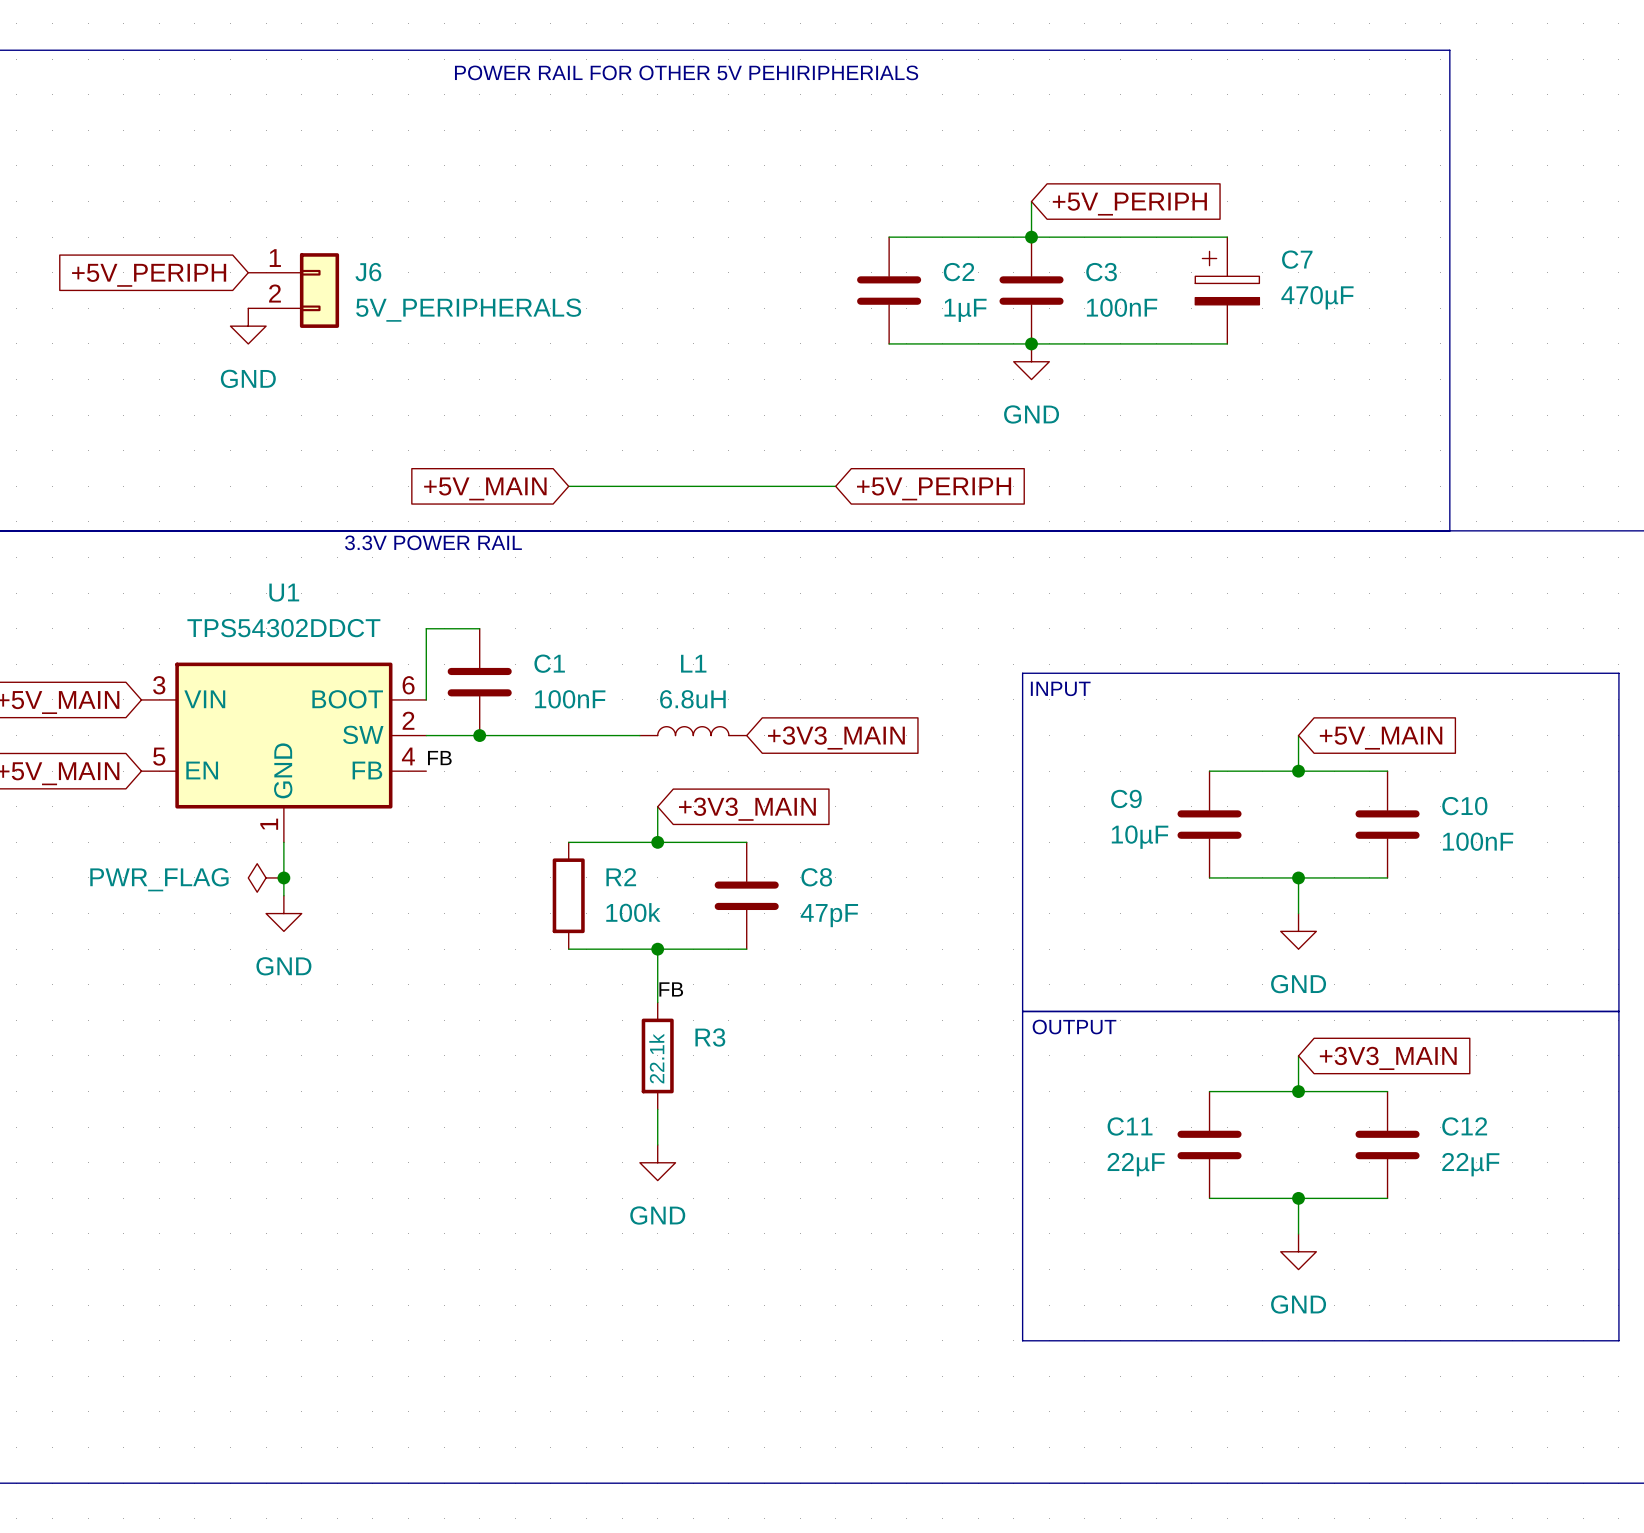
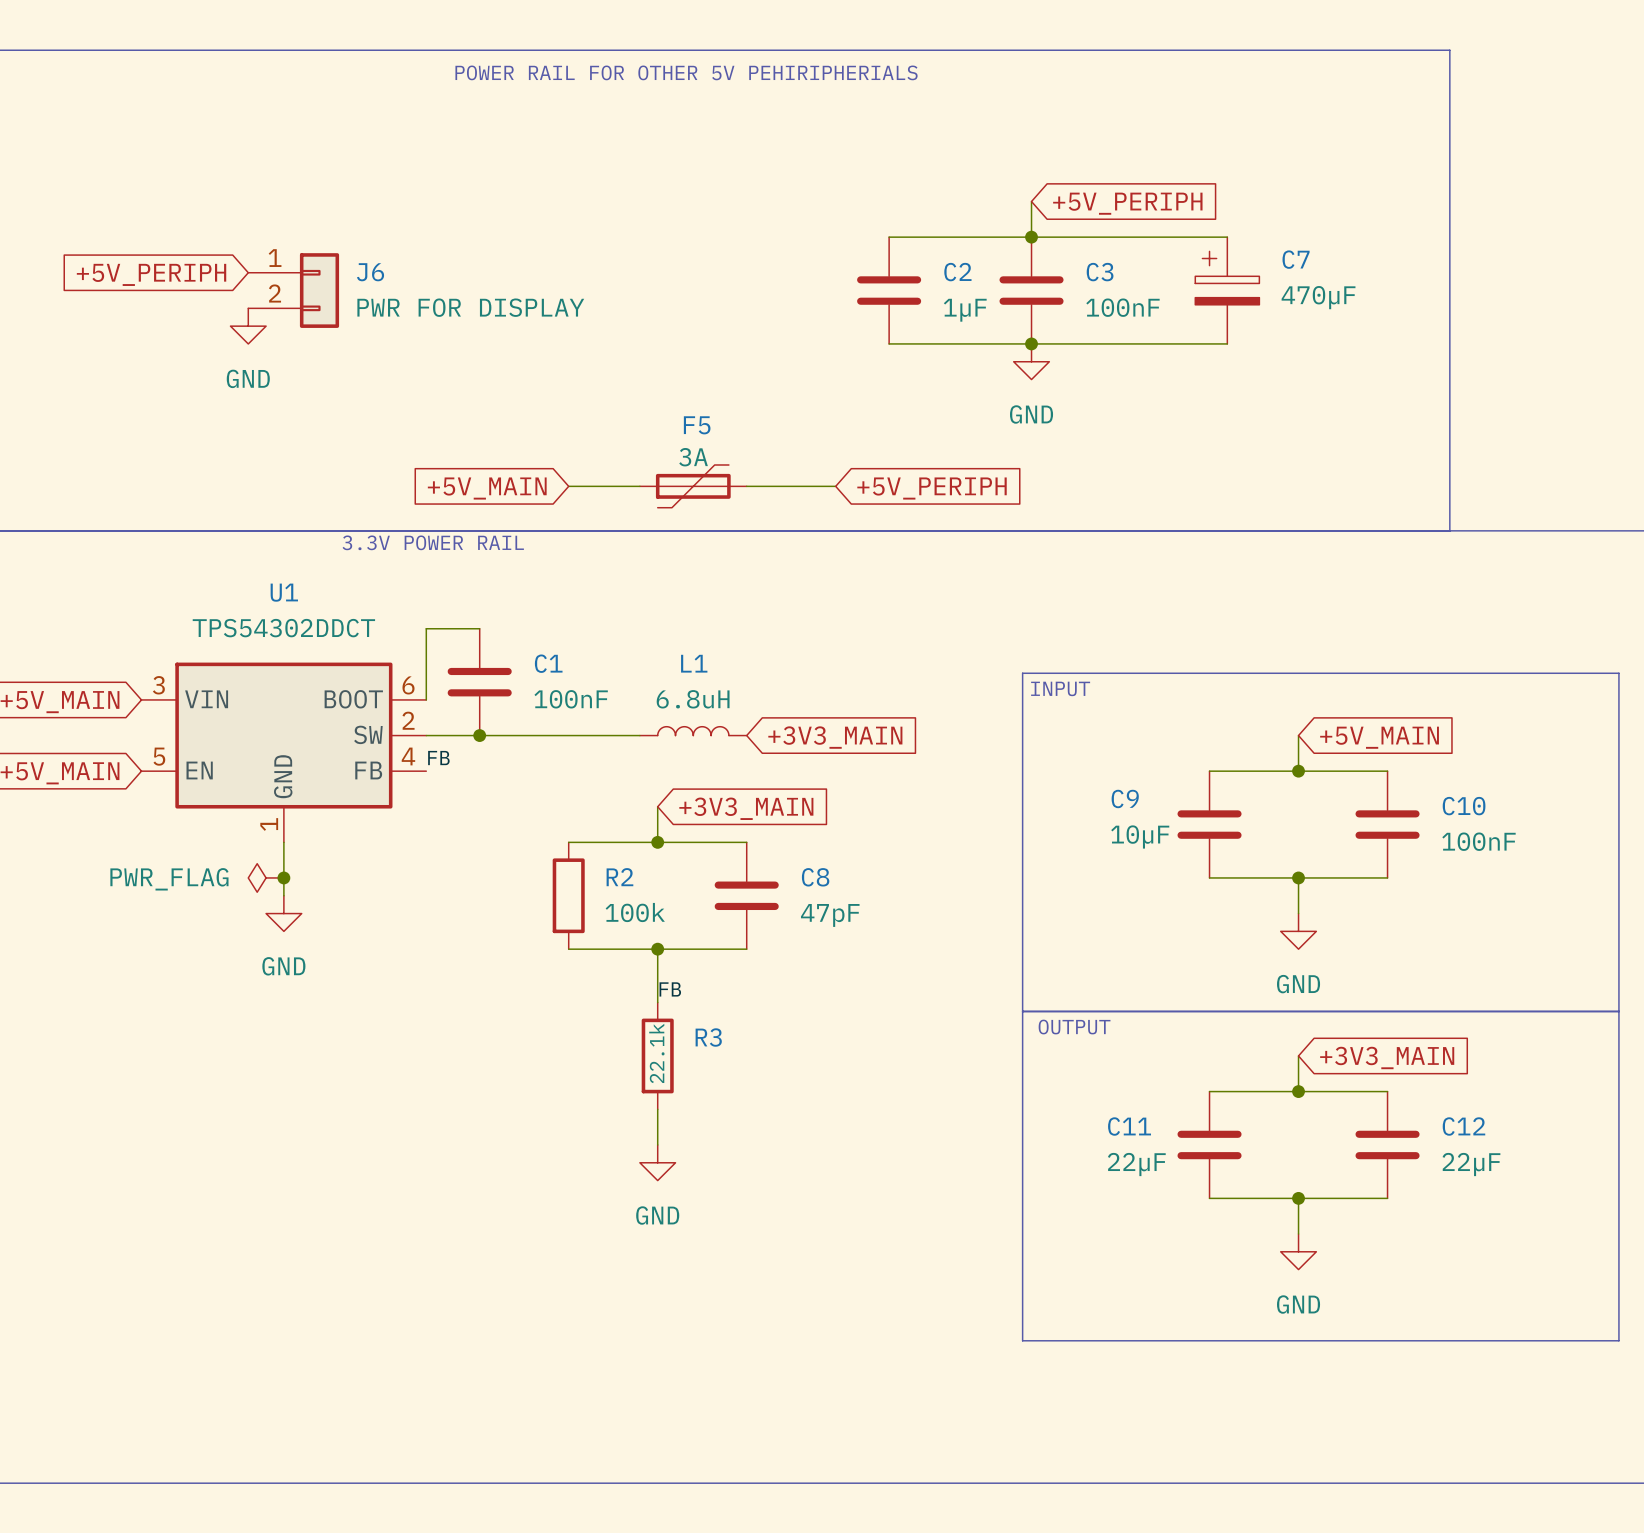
J6 value: 5V_PERIPHERALS (468, 310) -> PWR FOR DISPLAY (470, 307)
F5: none -> 3A (693, 486)

